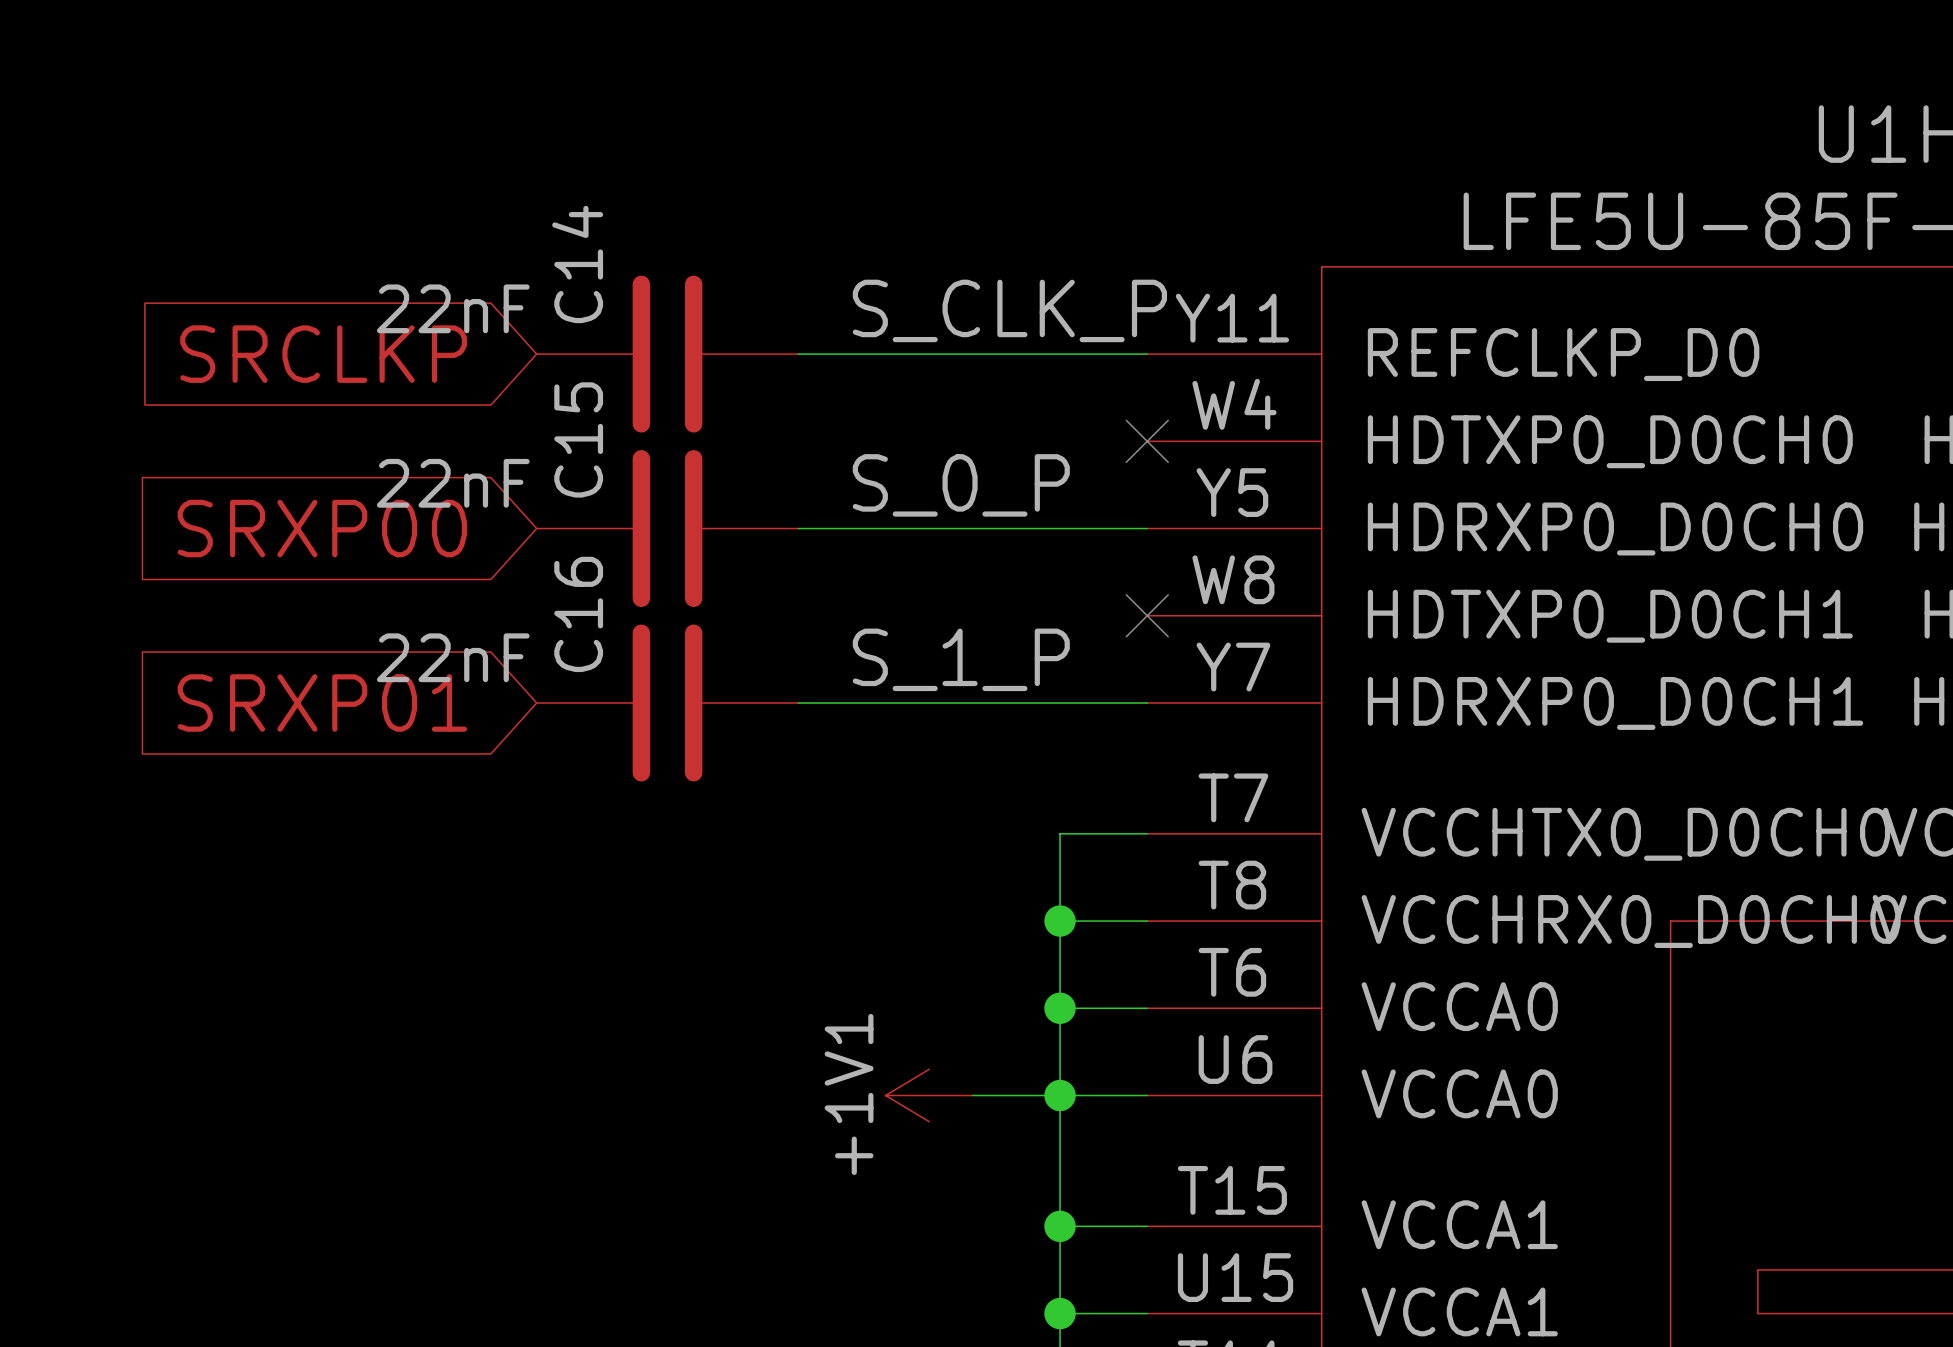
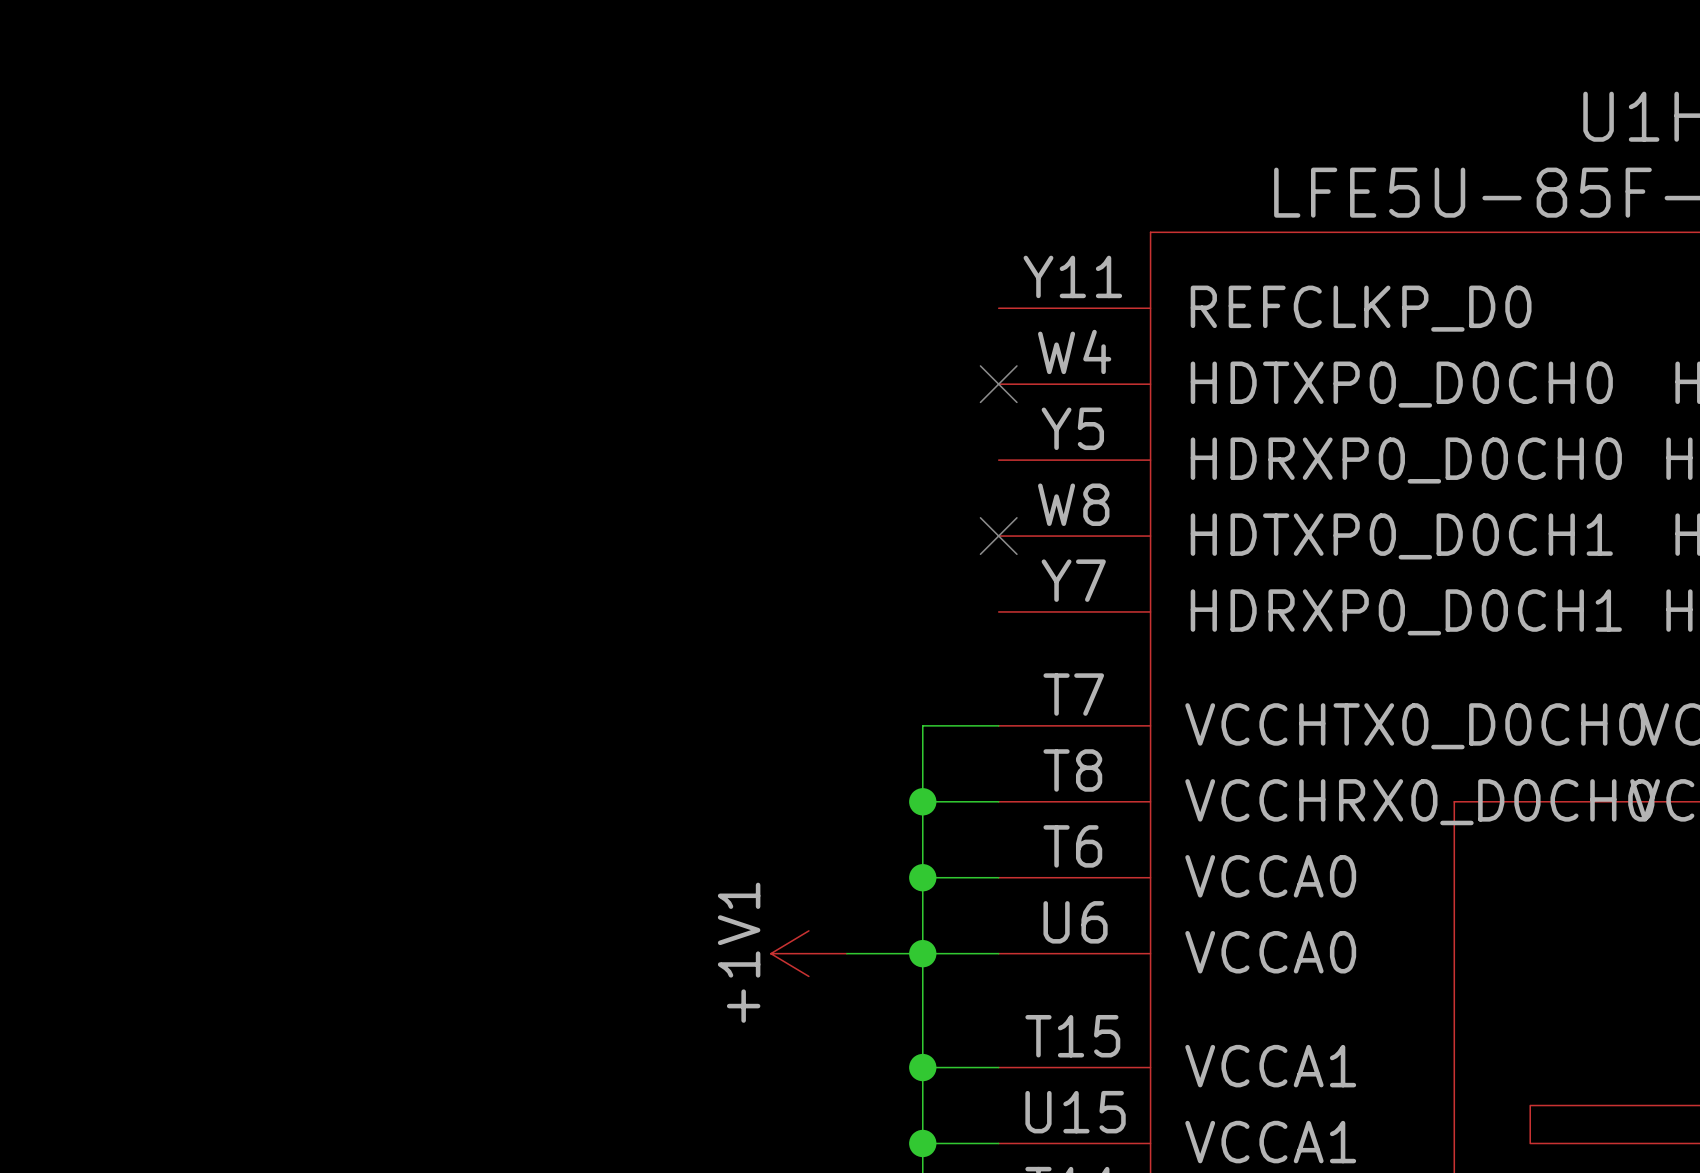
label: S_CLK_P (1009, 310) -> none
global label: SRCLKP (323, 354) -> none
C14: 22nF (667, 354) -> none
wire: (798, 354) (1147, 354) -> none
label: S_0_P (961, 485) -> none
global label: SRXP00 (322, 528) -> none
C15: 22nF (667, 528) -> none
wire: (798, 528) (1147, 528) -> none
label: S_1_P (961, 659) -> none
global label: SRXP01 (322, 703) -> none
C16: 22nF (667, 703) -> none
wire: (798, 703) (1147, 703) -> none

